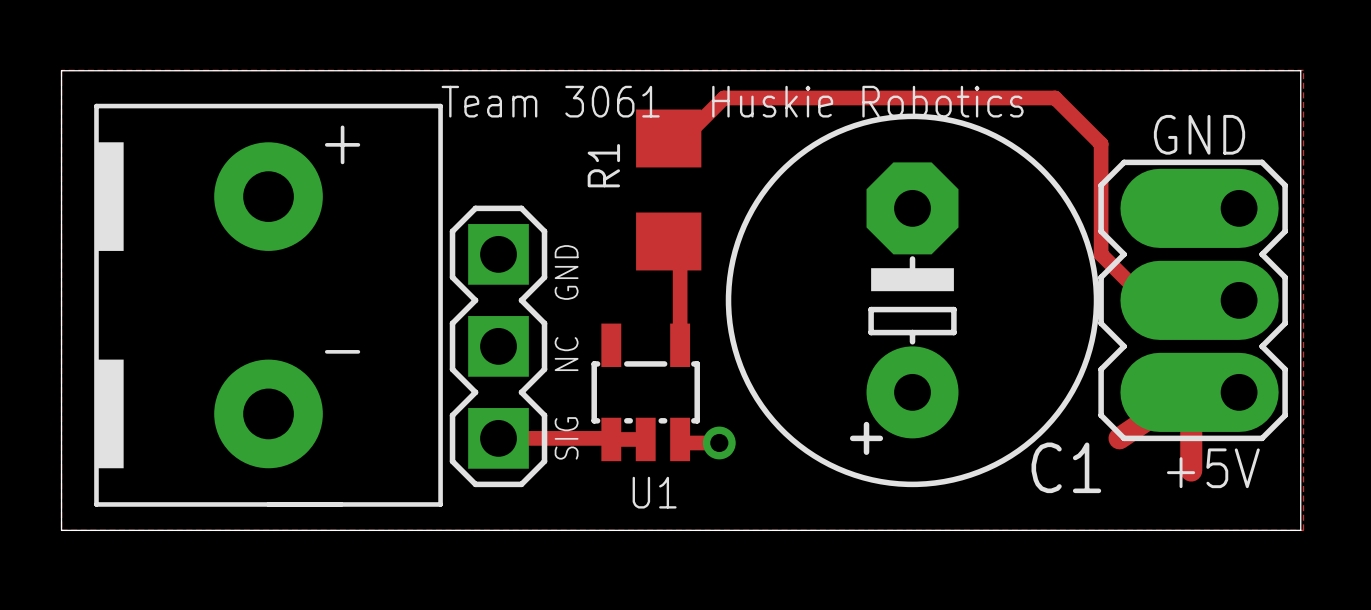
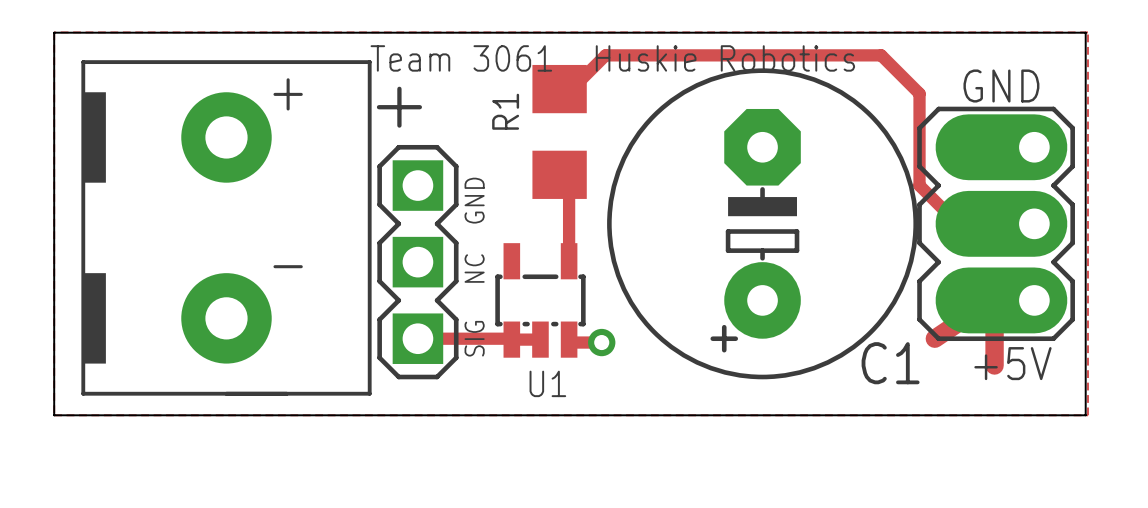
text: none -> + (399, 107)

